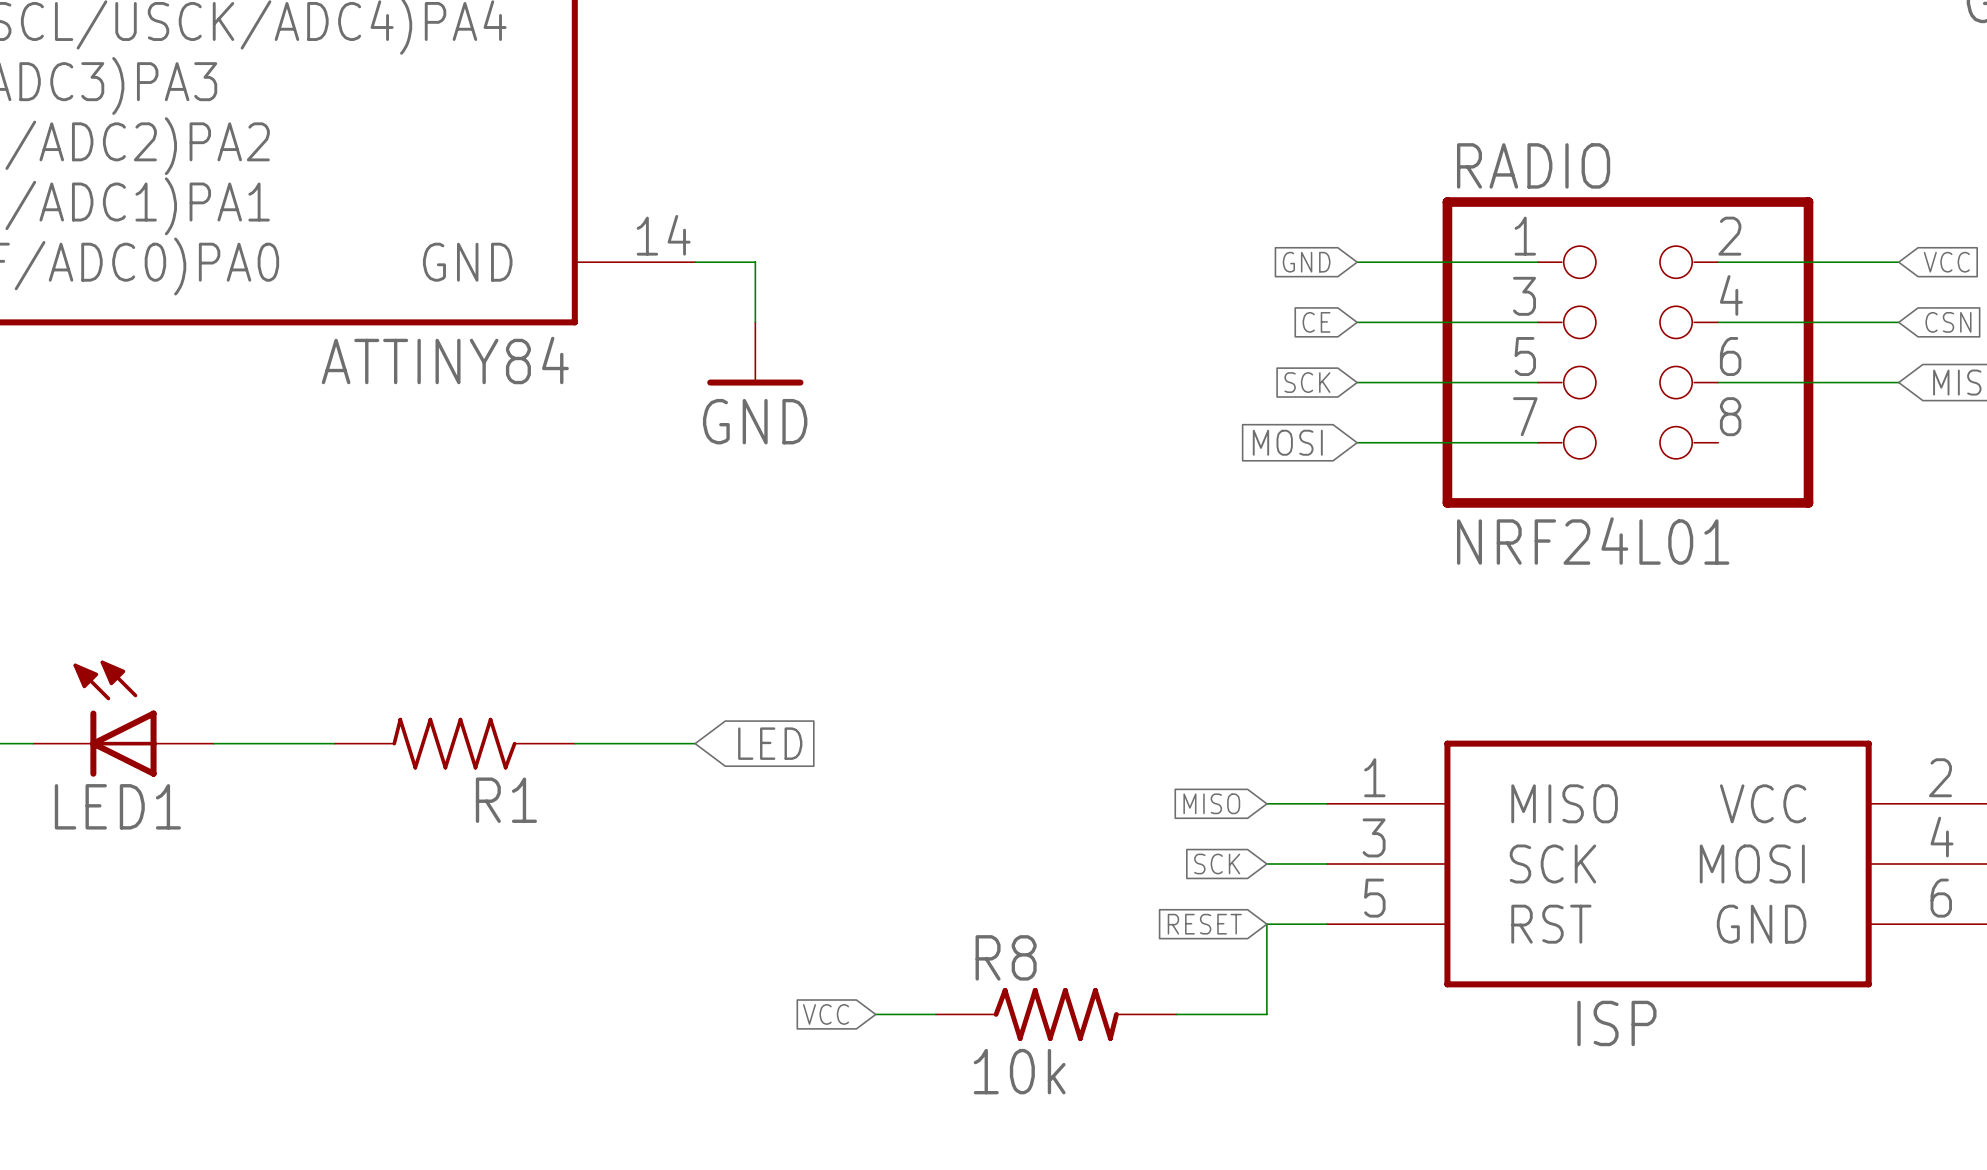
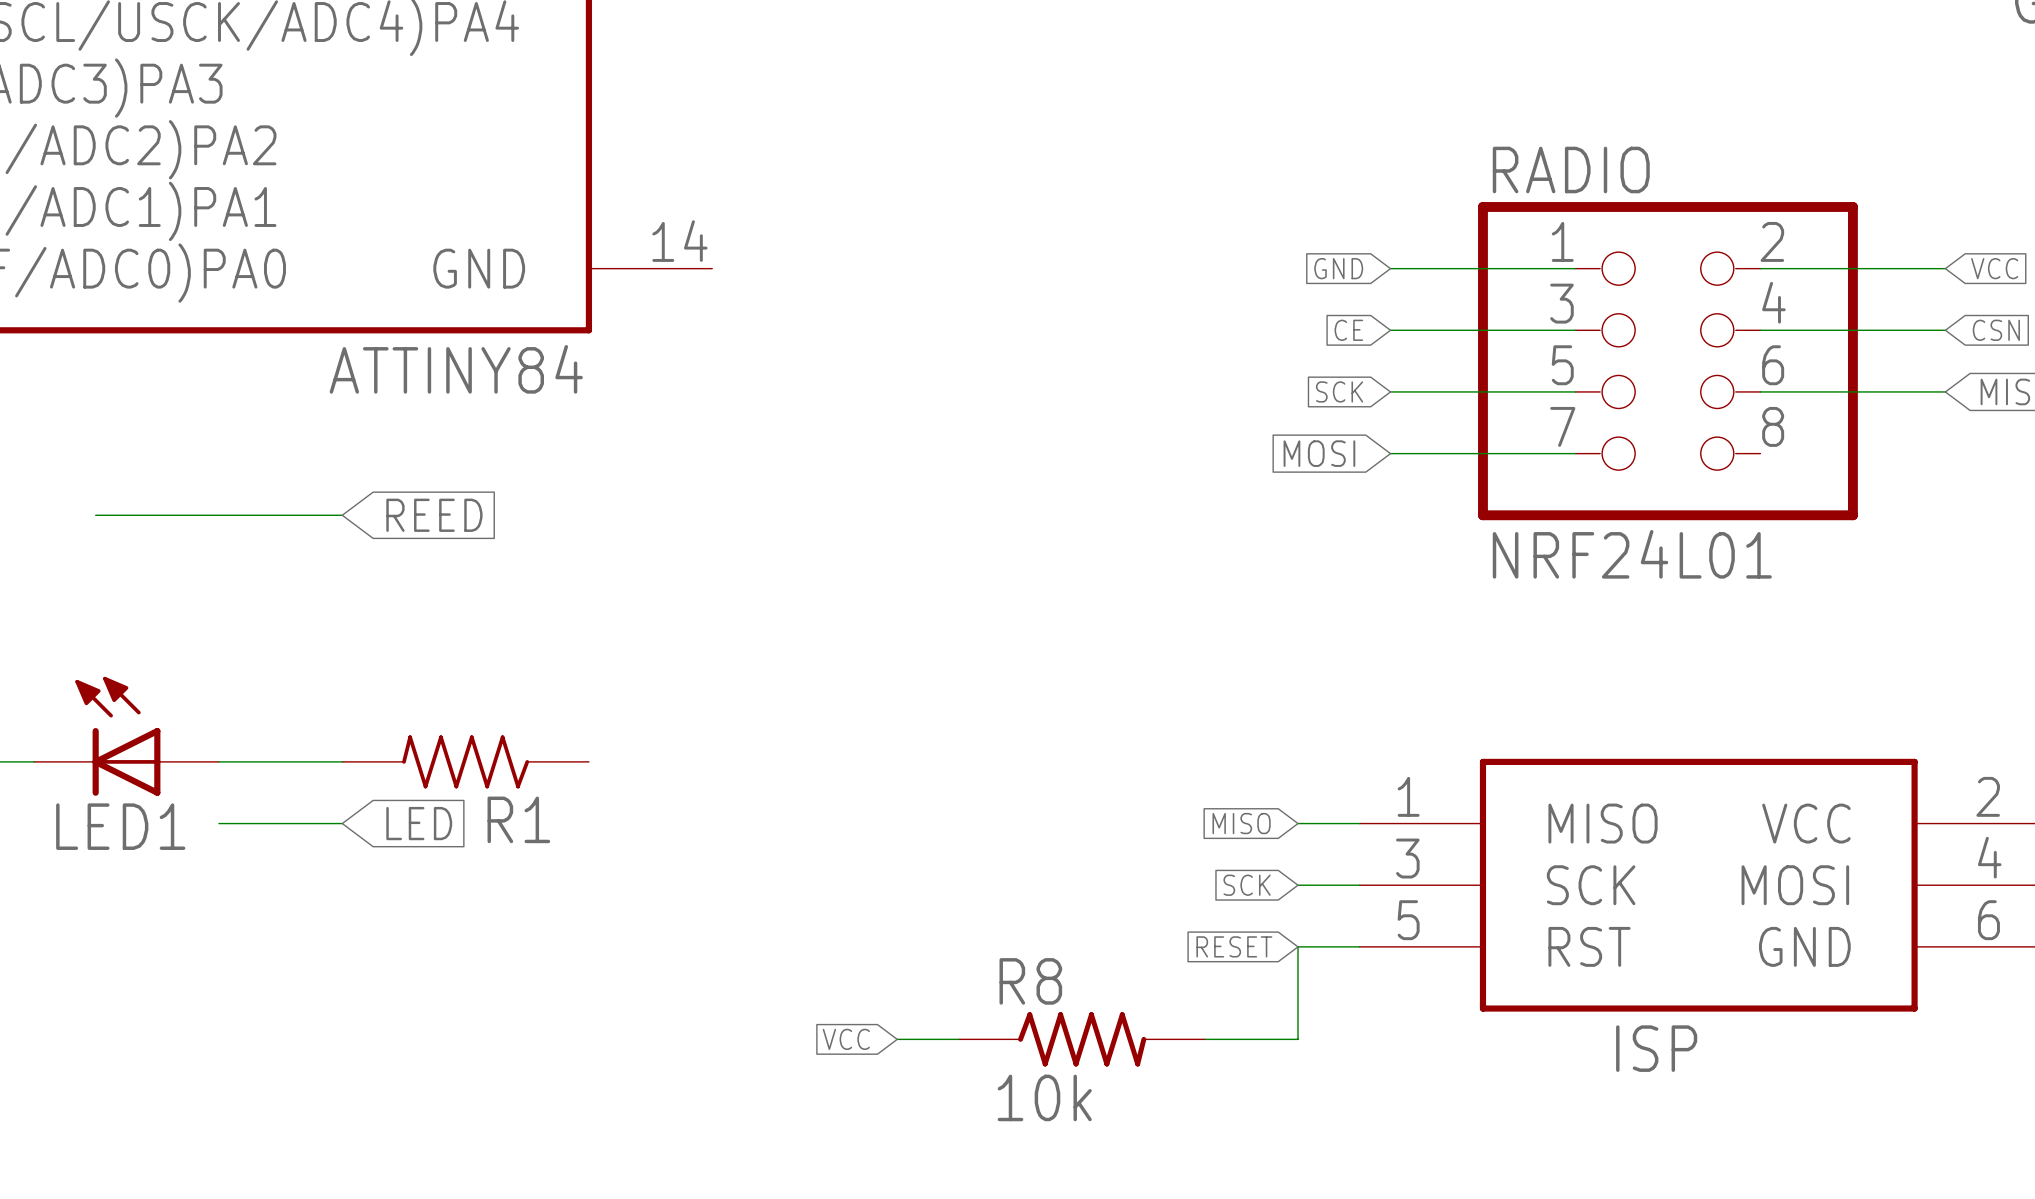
wire: (695, 262) (755, 262) (755, 322) -> none
power symbol: GND (755, 353) -> none
wire: none -> (95, 515) (342, 515)
global label: none -> REED (434, 515)
wire: (574, 743) (695, 743) -> (218, 823) (342, 823)
global label position: LED (770, 743) -> LED (419, 823)

